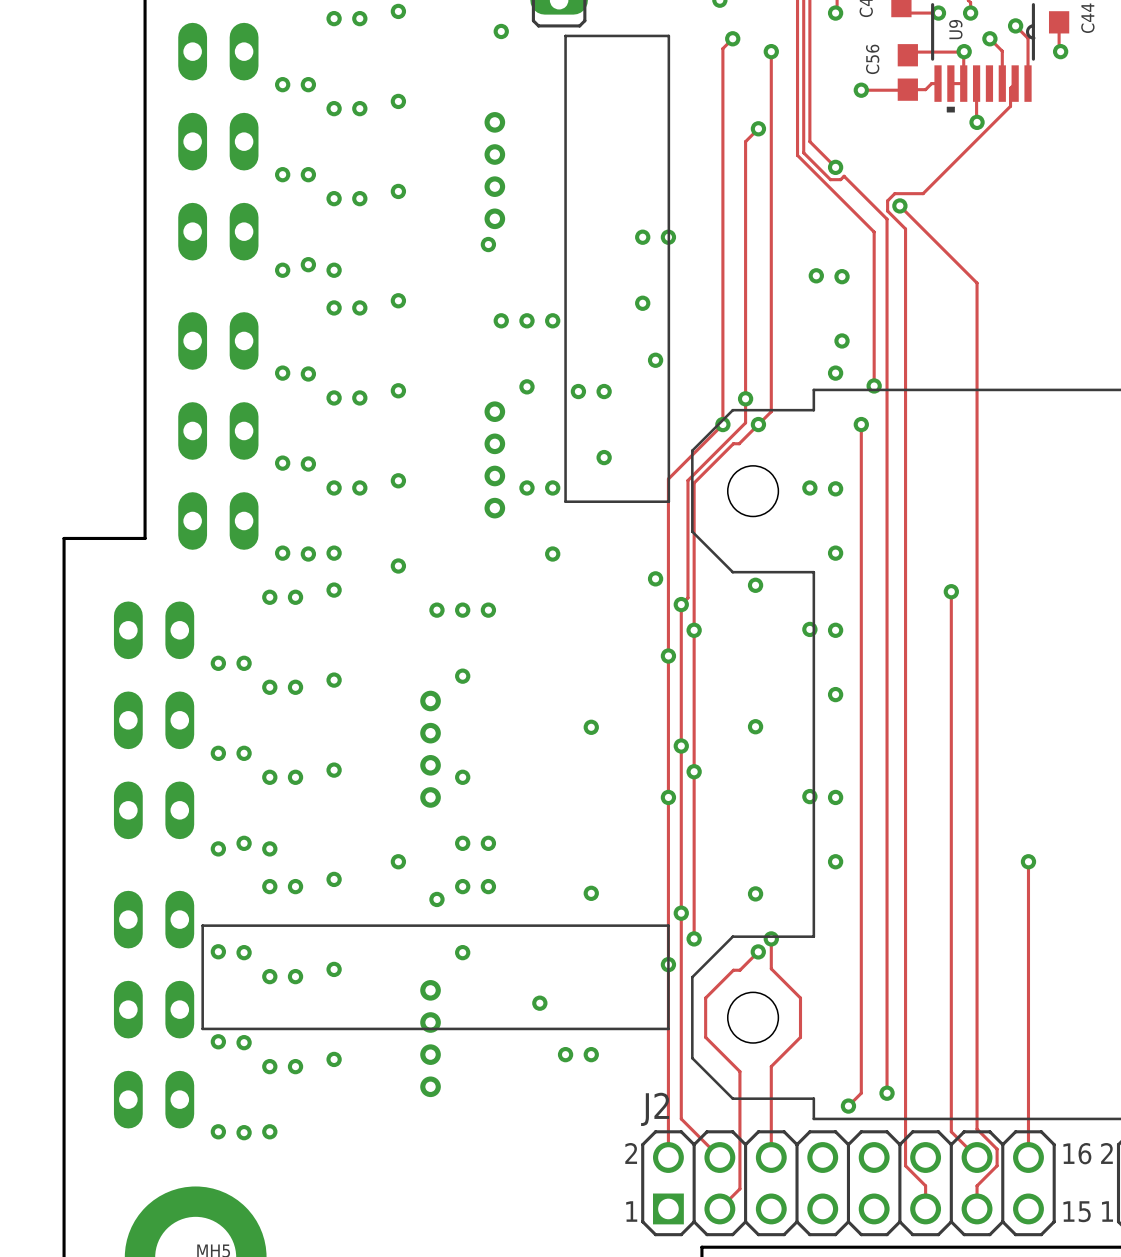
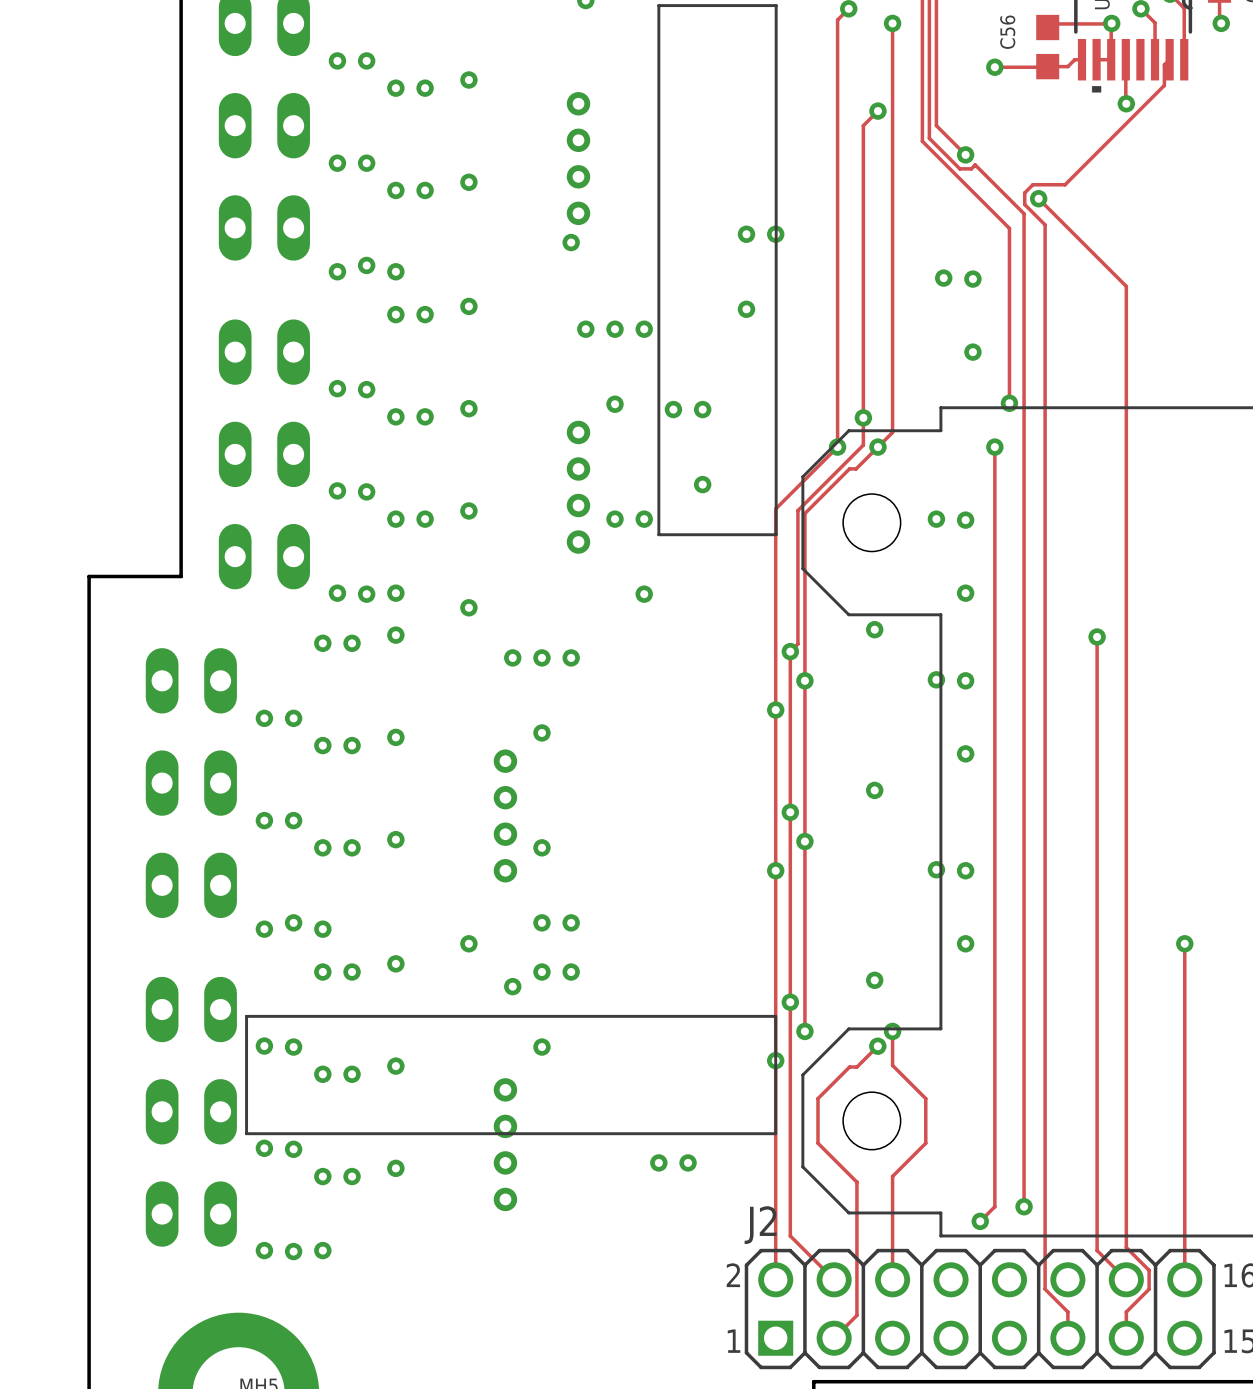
via: (655, 360) -> none
via: (835, 373) -> none
via: (655, 578) -> none
via: (591, 727) -> none
via: (591, 893) -> none
via: (539, 1003) -> none

